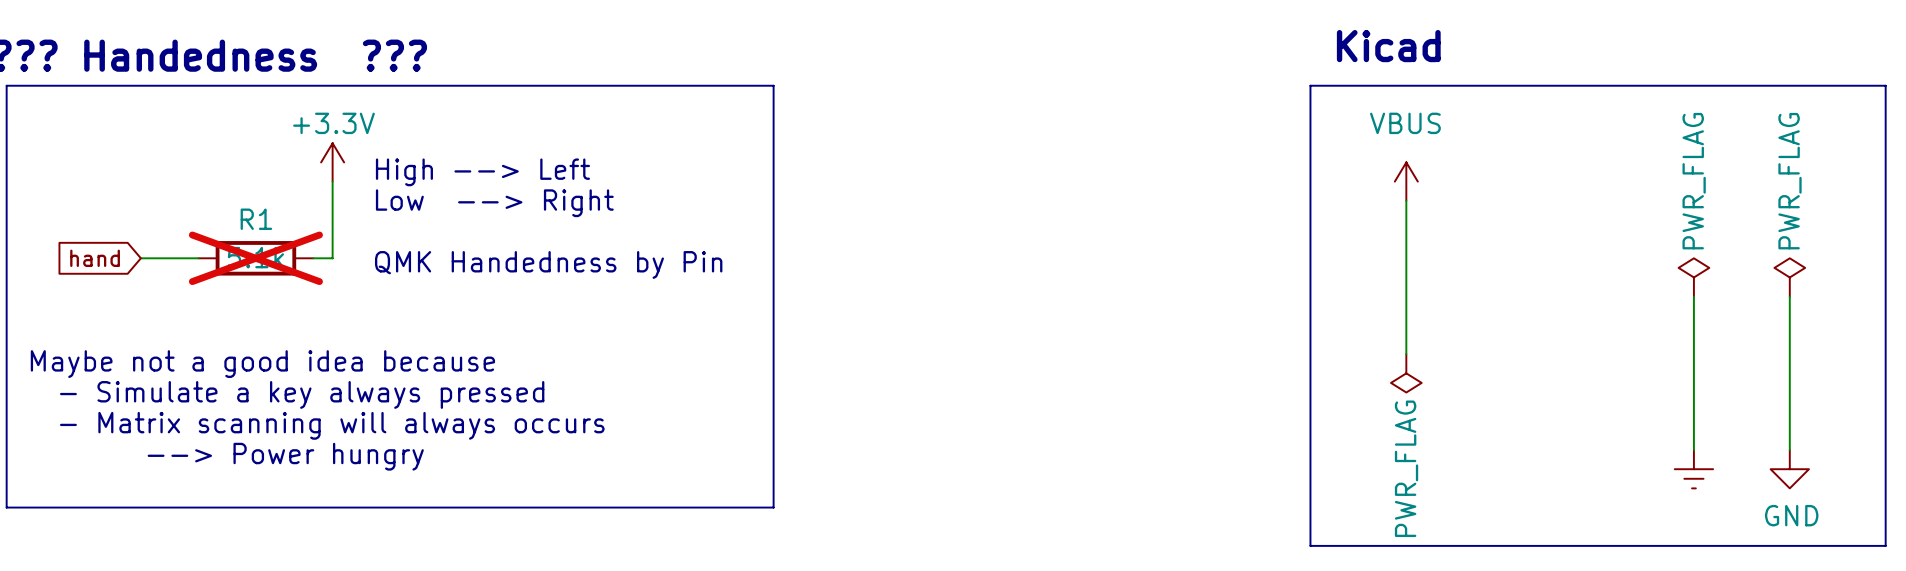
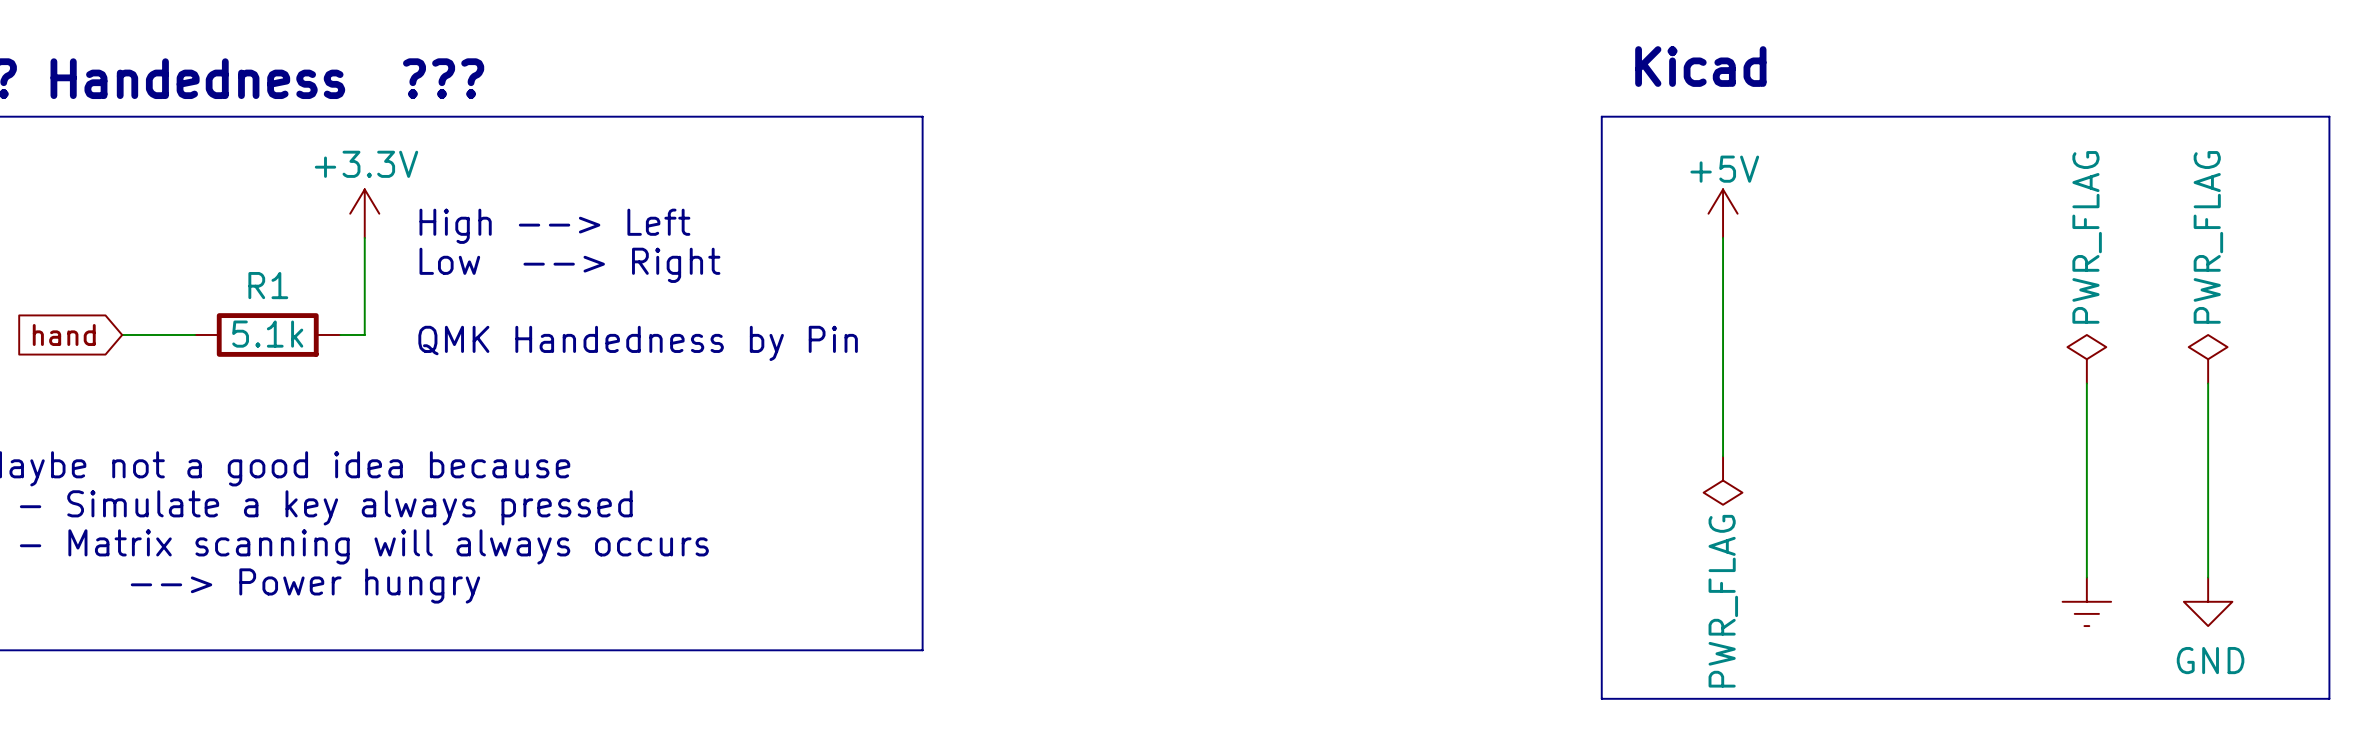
power symbol: none -> +5V (1723, 213)
power symbol: VBUS (1406, 181) -> none
R1 do-not-place cross: (255, 258) -> none

